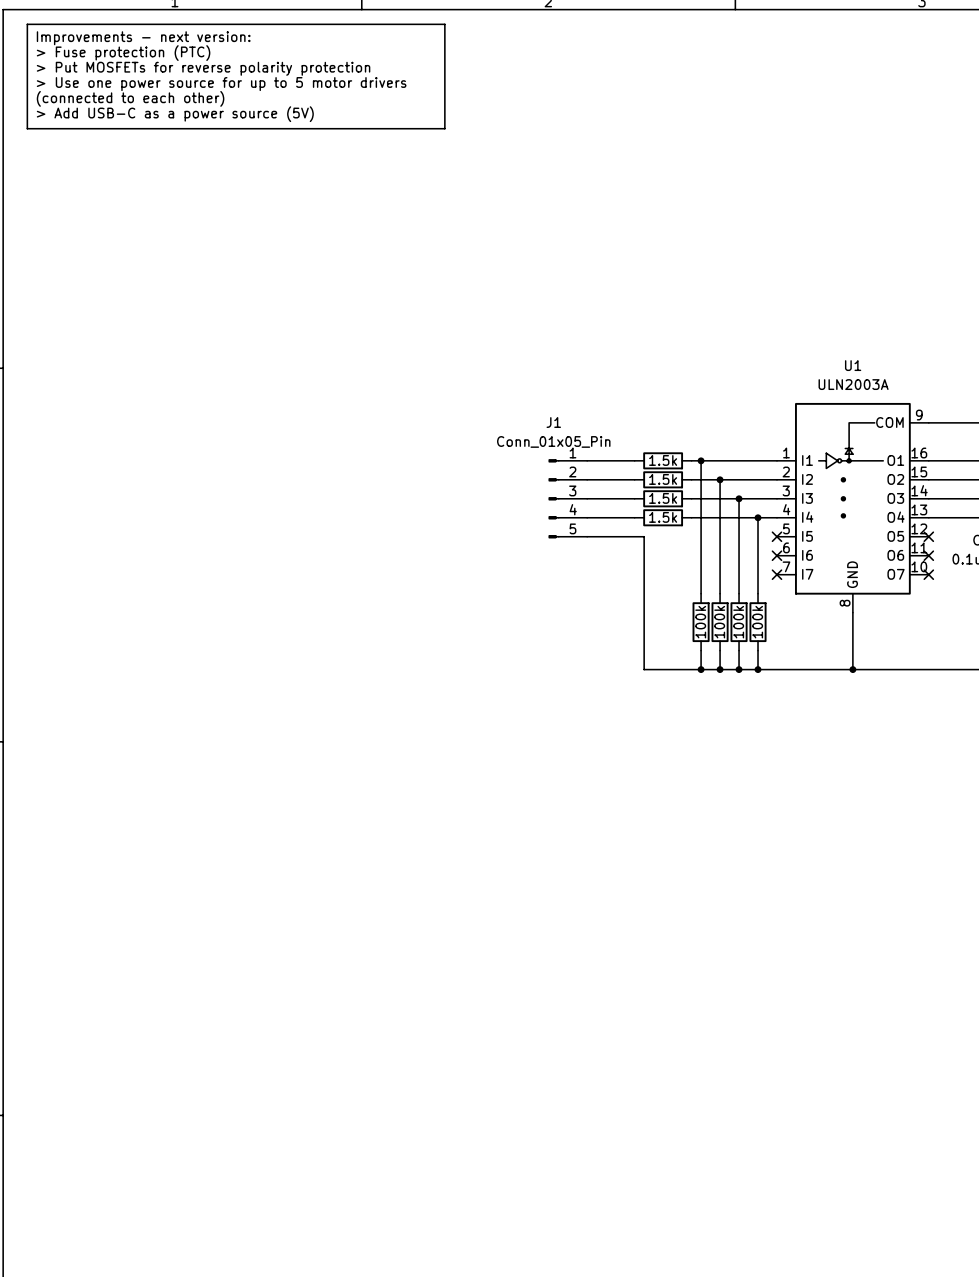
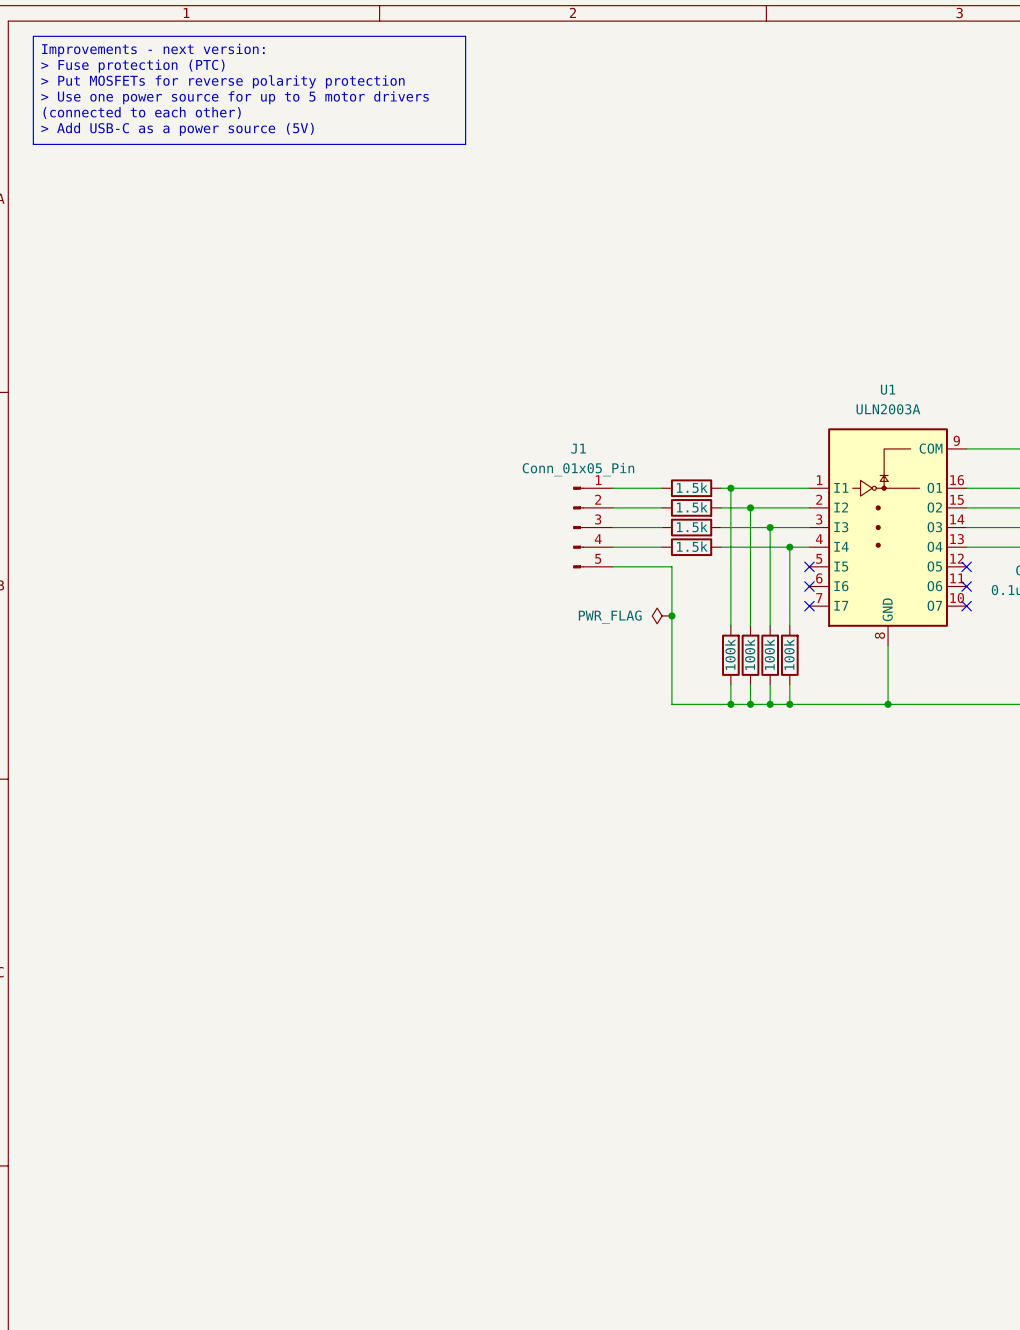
power symbol: none -> PWR_FLAG (662, 615)
junction: none -> (671, 615)

